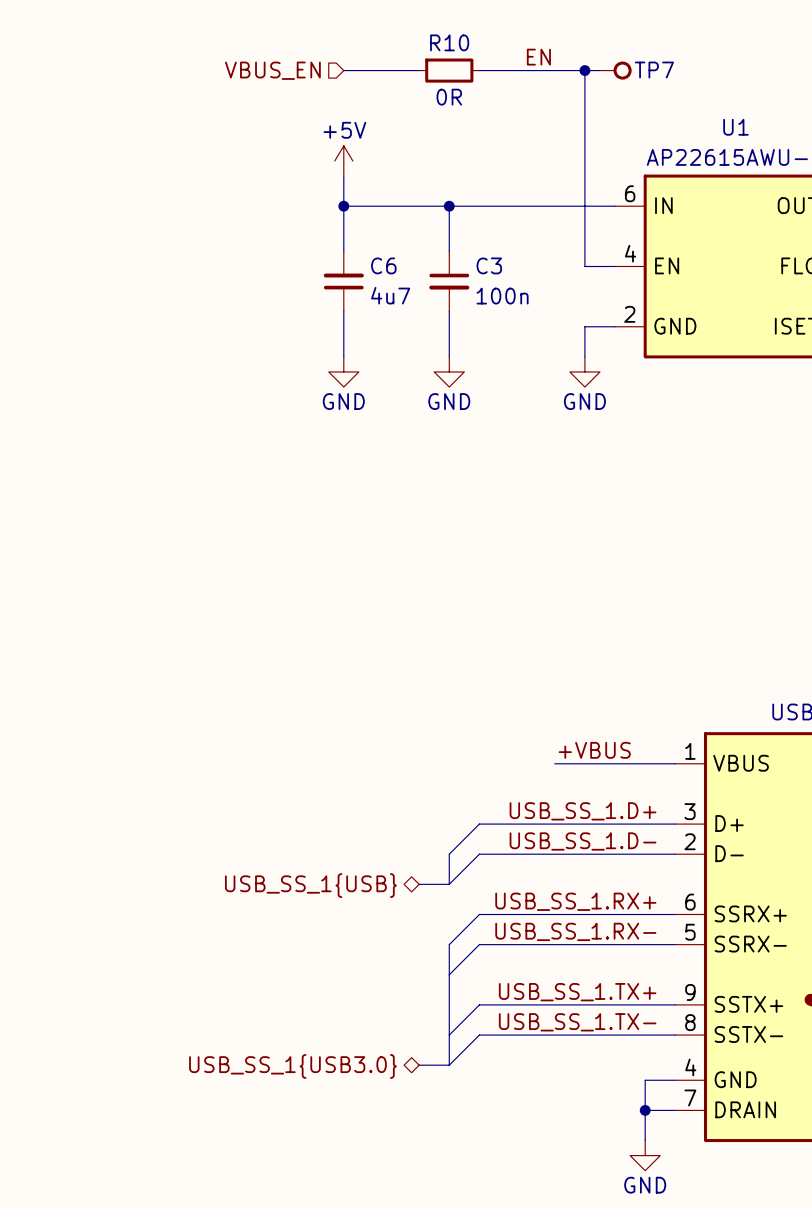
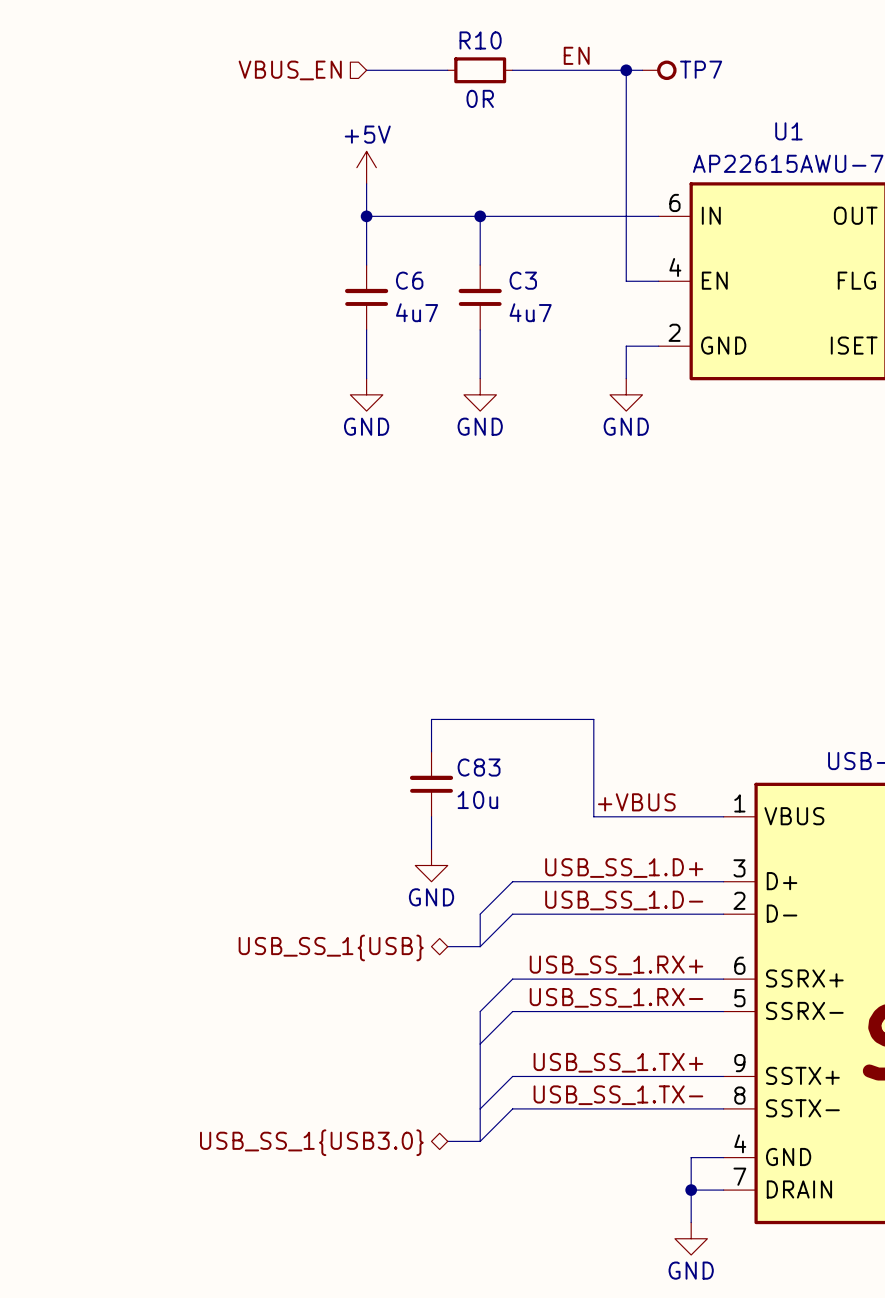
C3 rotation: 0° (449, 281) -> 180° (480, 297)
C3 text: 100n (502, 296) -> 4u7 (530, 312)
wire: none -> (431, 751) (431, 719) (593, 719) (593, 816)
C83: none -> (431, 784)
wire: none -> (431, 816) (431, 849)
power symbol: none -> GND (431, 865)

